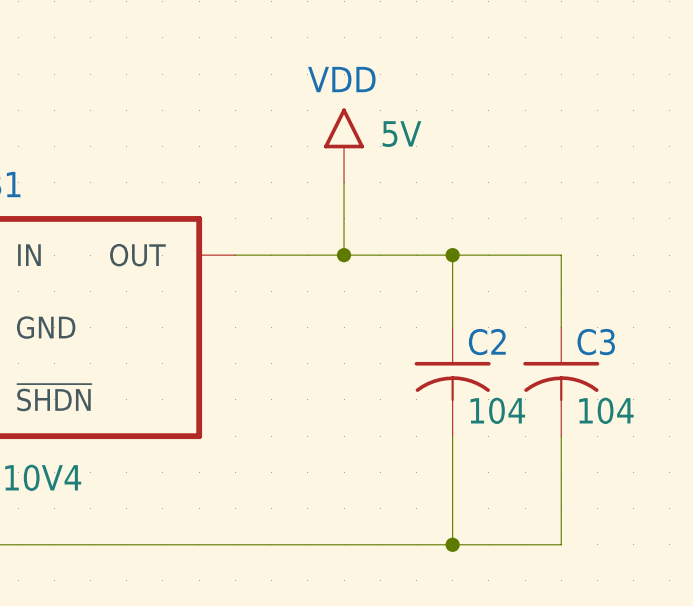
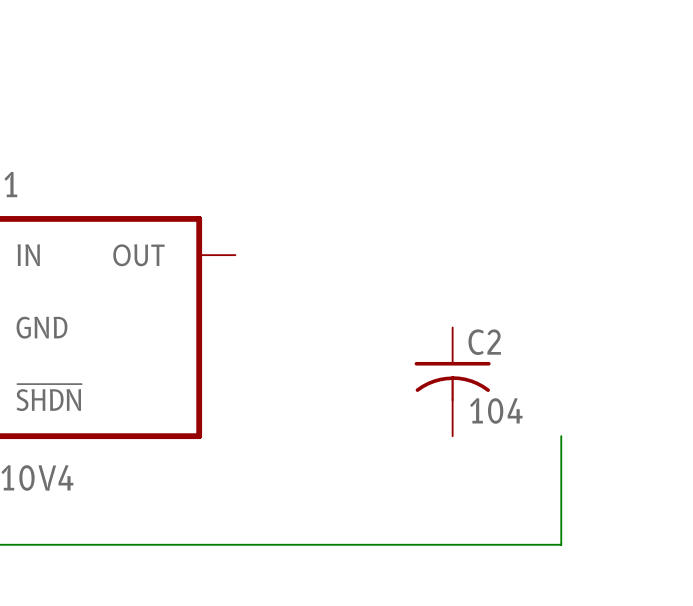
power symbol: 5V (344, 145) -> none
wire: (344, 182) (344, 255) -> none
wire: (235, 255) (561, 255) (561, 327) -> none
junction: (344, 255) -> none
wire: (452, 255) (452, 327) -> none
junction: (452, 255) -> none
C3: 104 (561, 381) -> none
wire: (452, 436) (452, 544) -> none
junction: (452, 544) -> none

